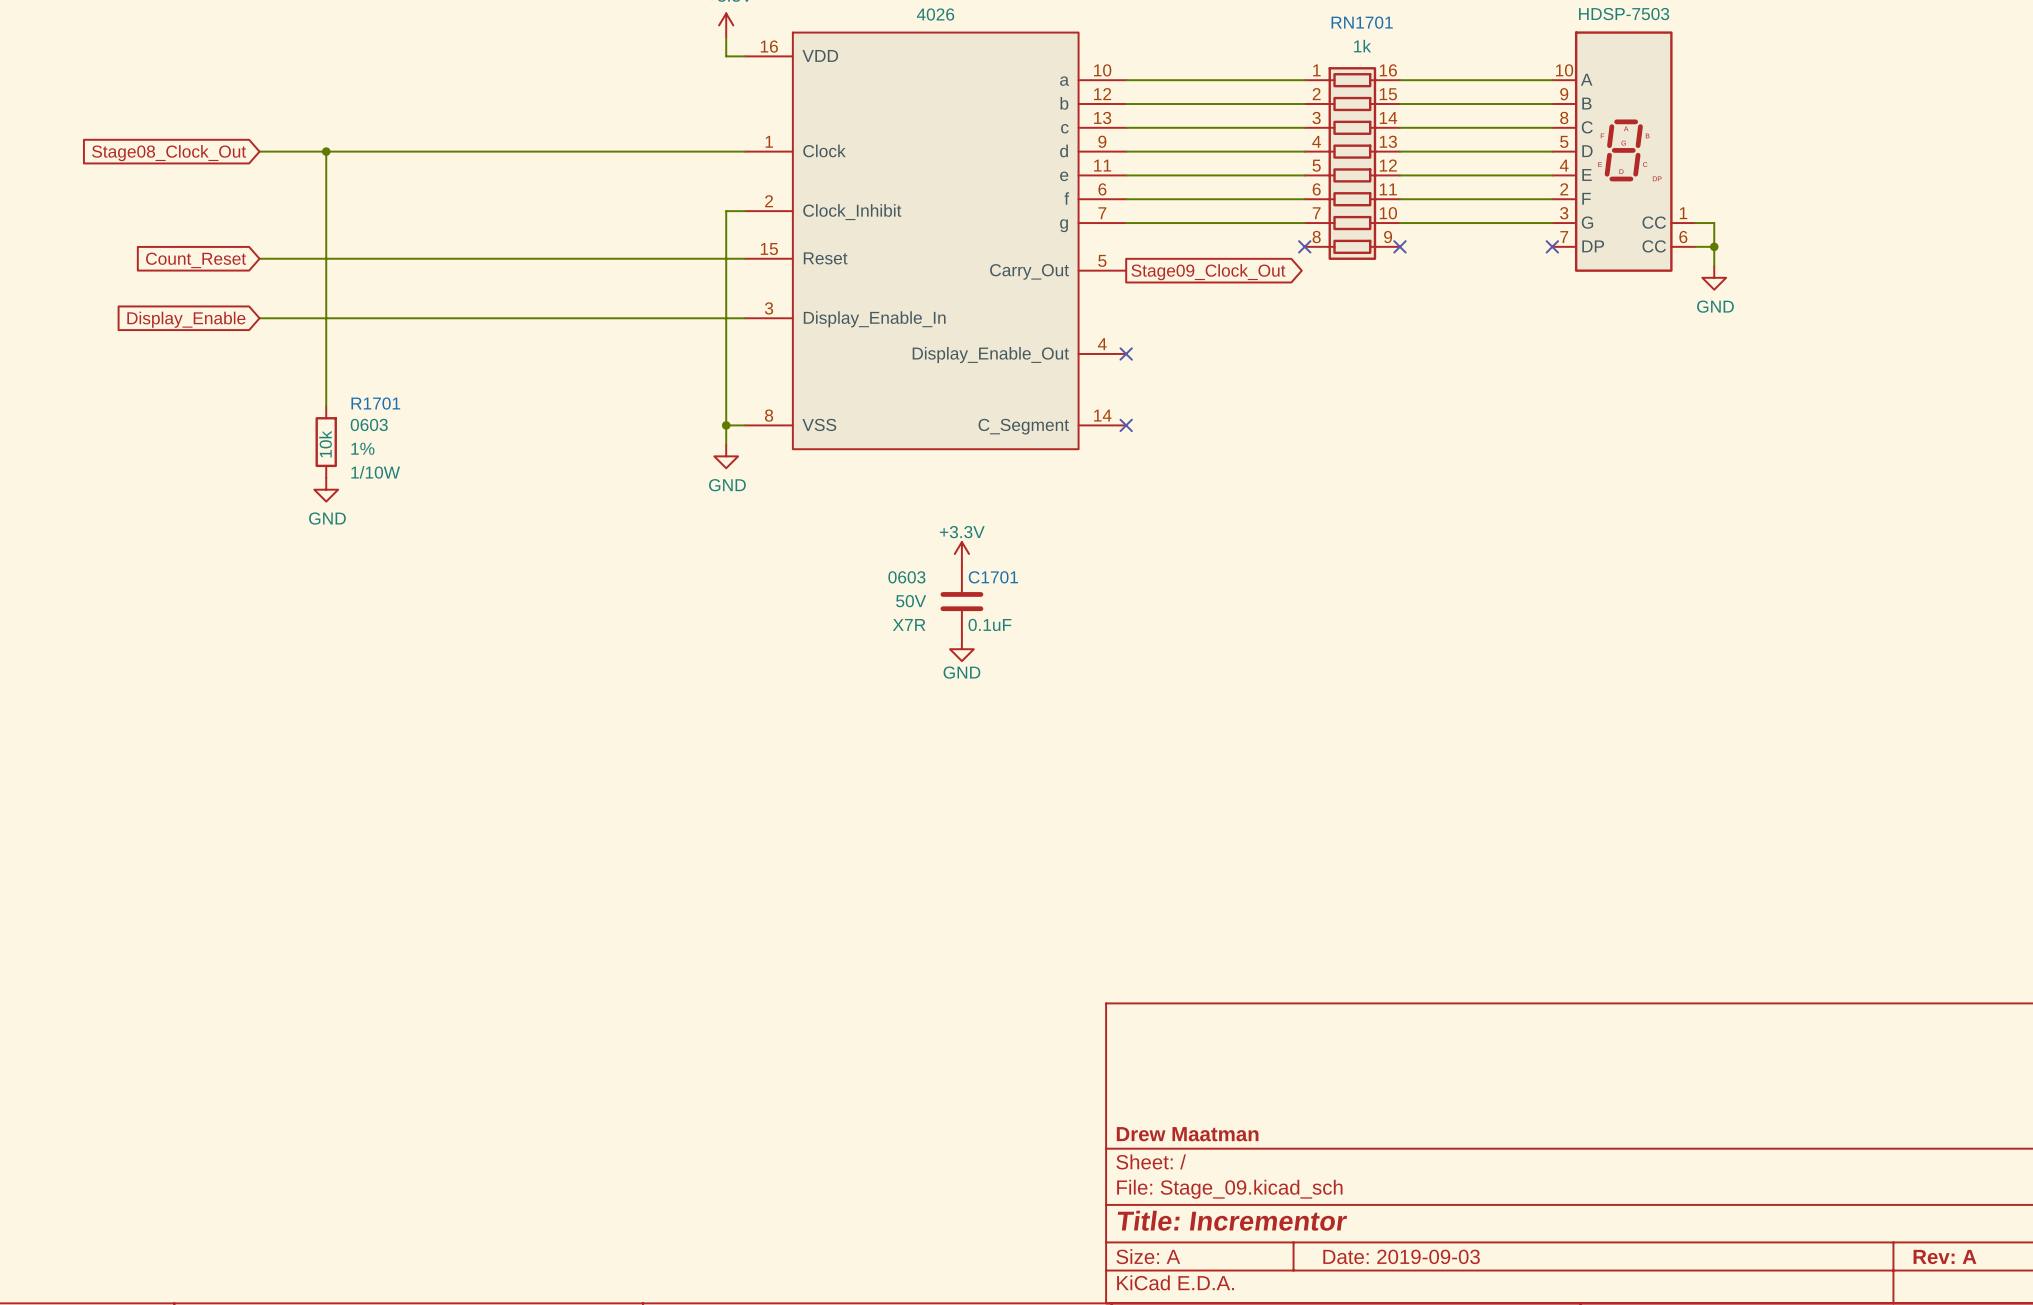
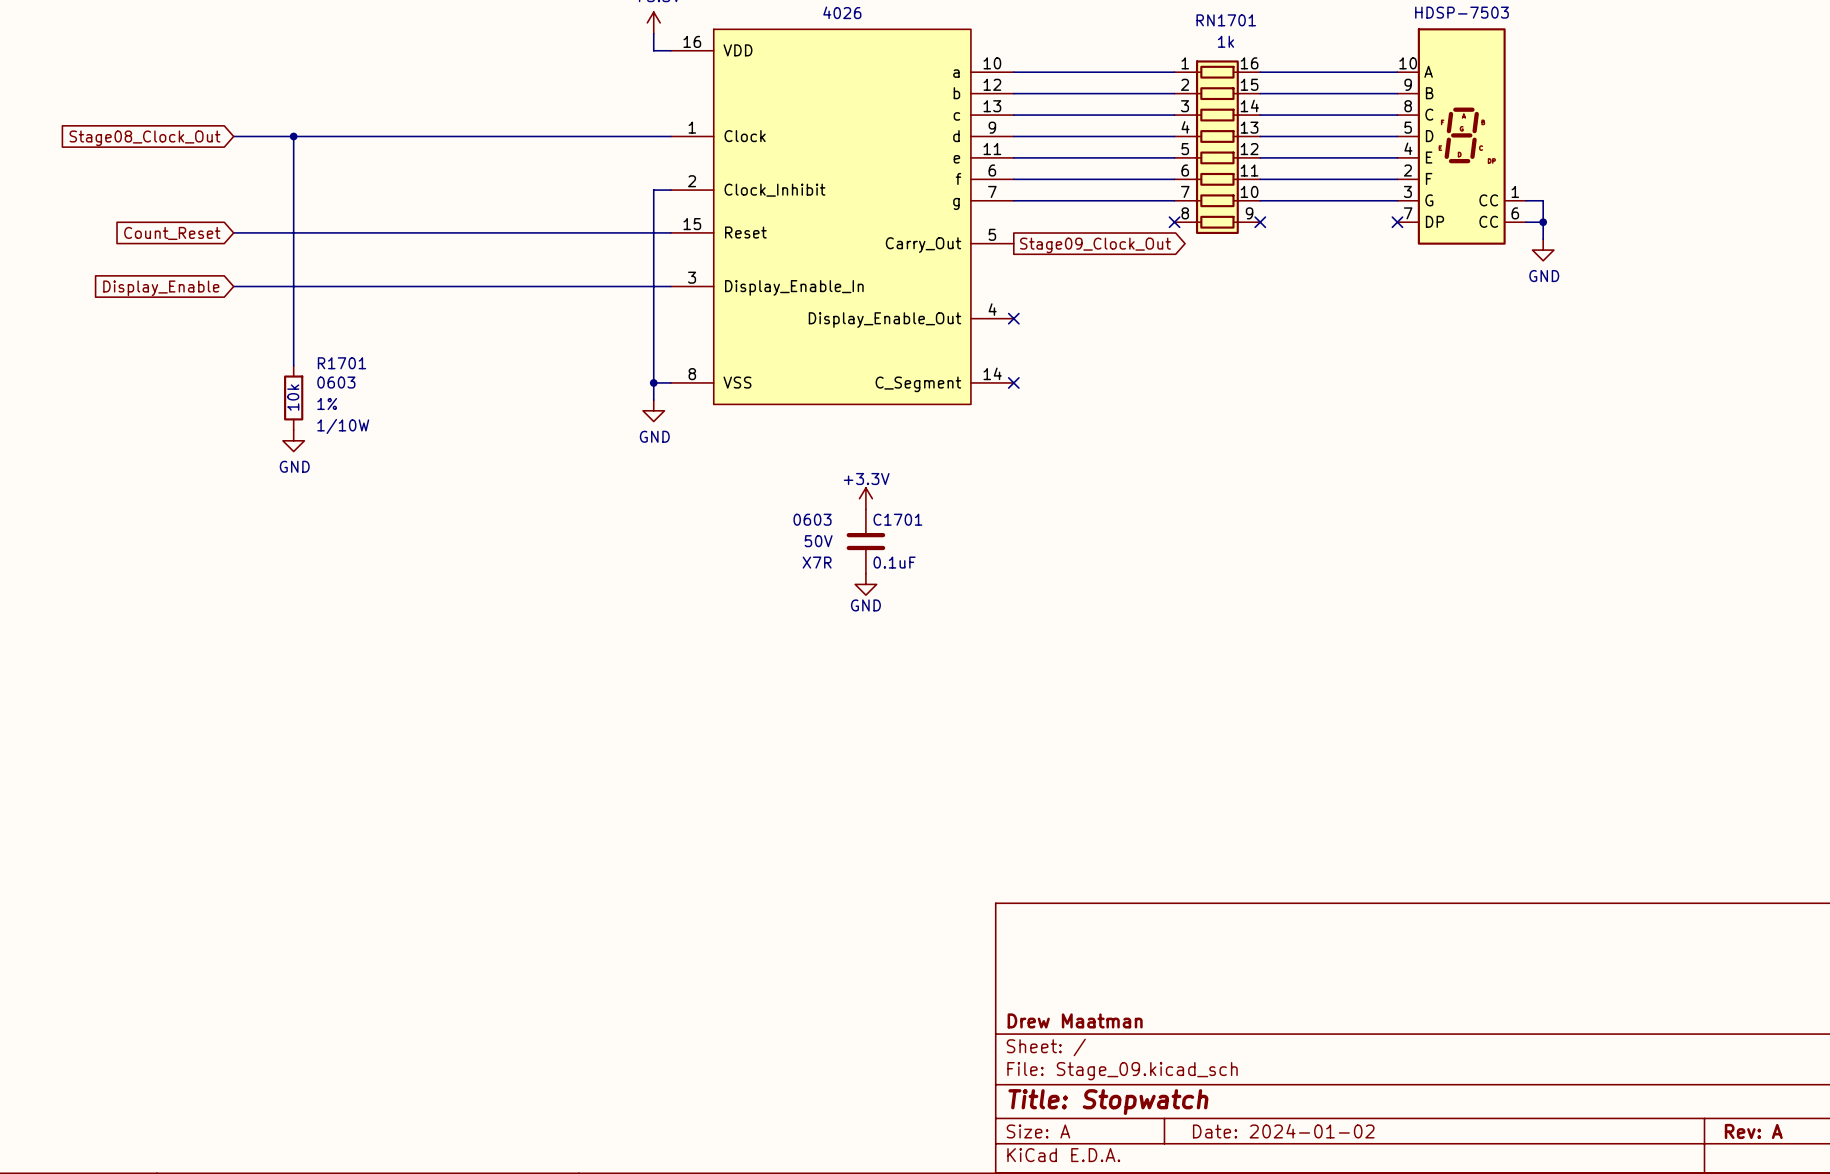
title block: Title: Incrementor (1232, 1220) -> Title: Stopwatch (1108, 1102)
title block: Date: 2019-09-03 (1401, 1256) -> Date: 2024-01-02 (1283, 1131)

